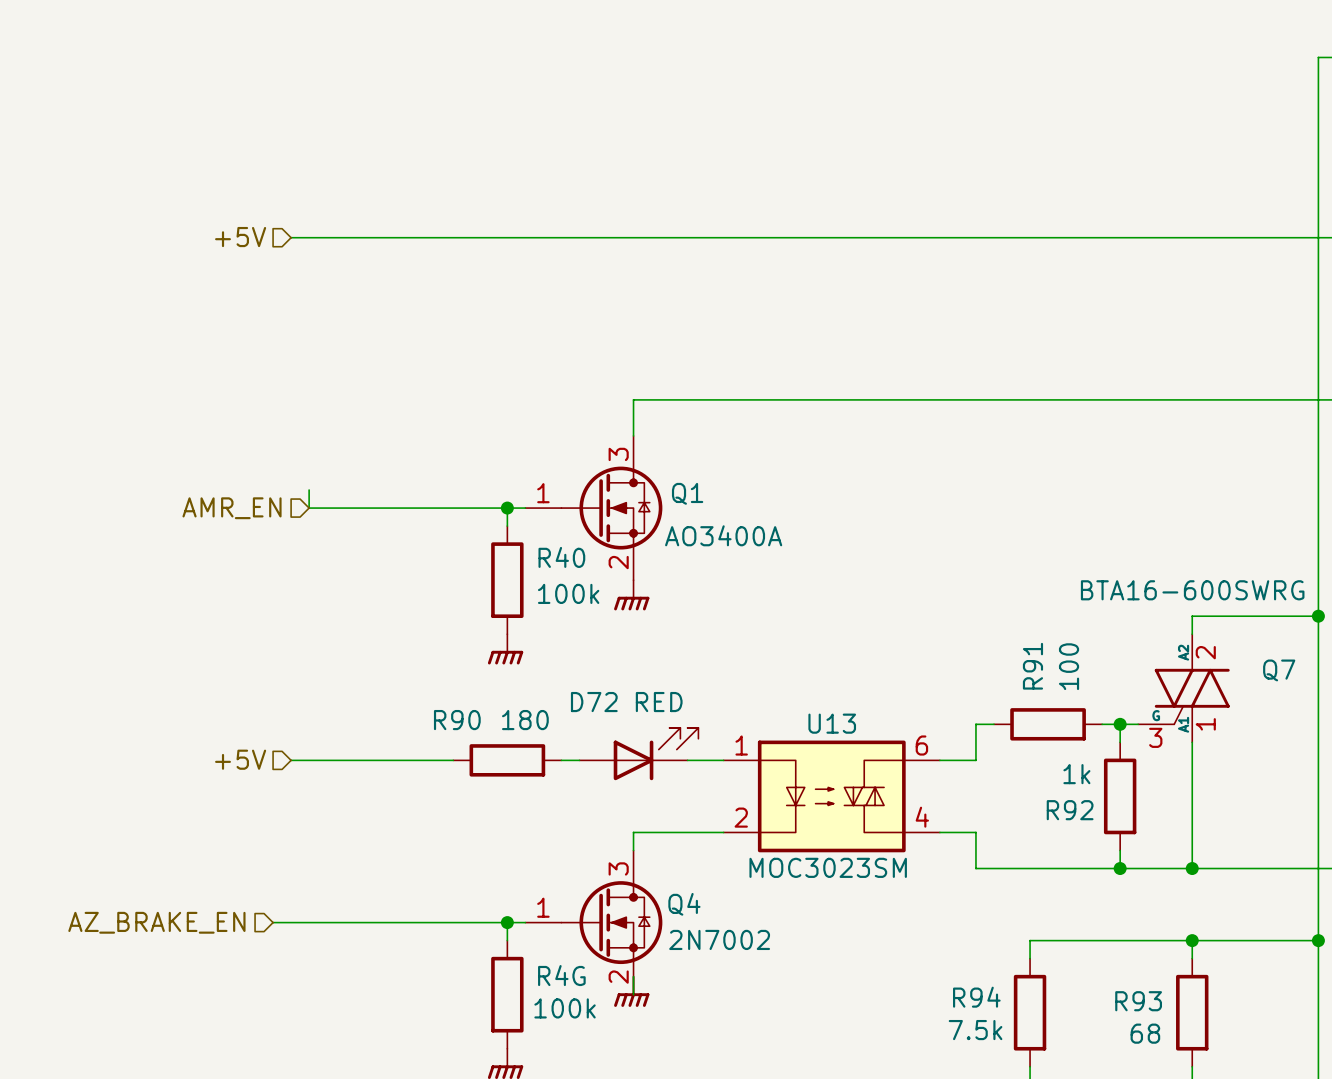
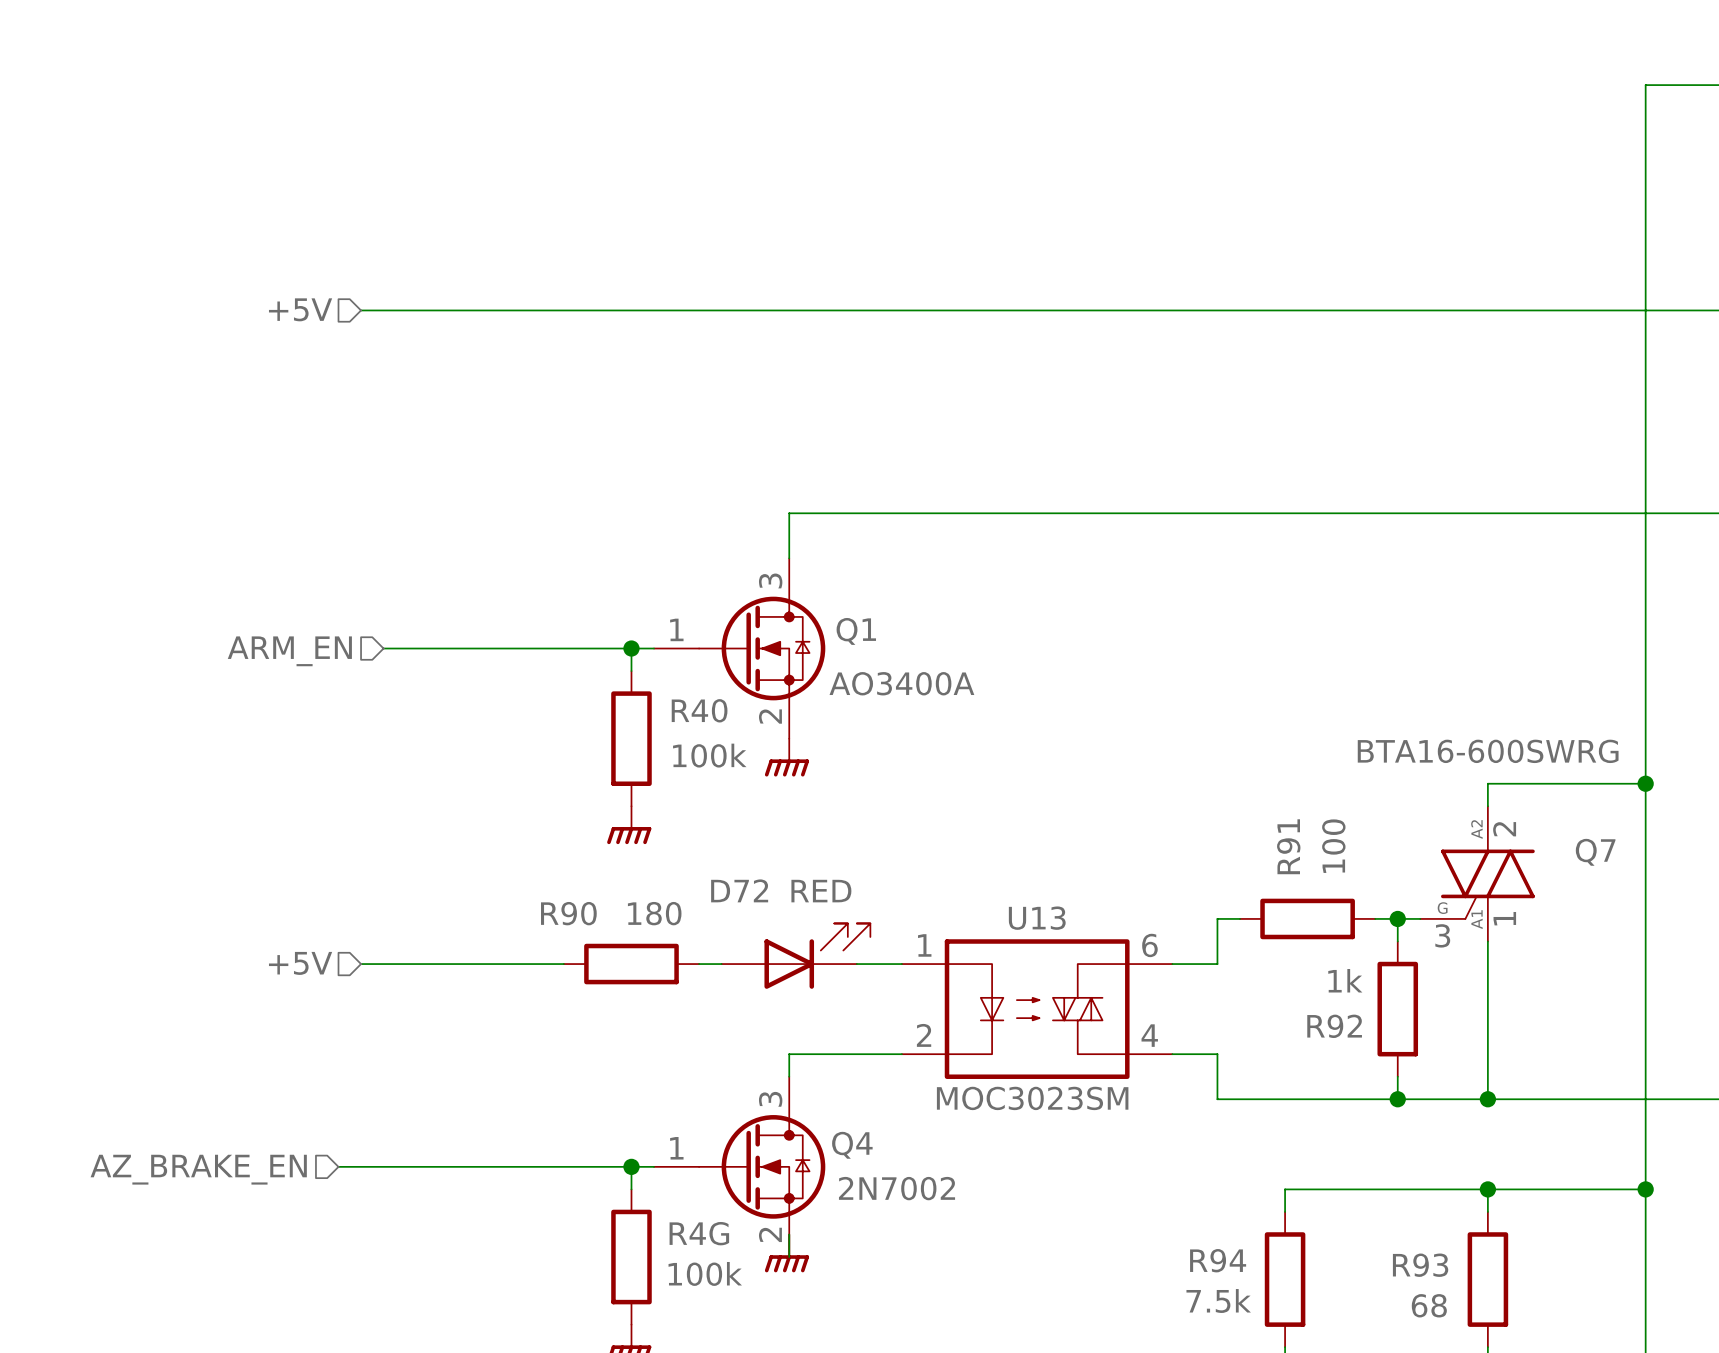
wire: (309, 490) (309, 508) -> none
hierarchical label: AMR_EN (232, 508) -> ARM_EN (289, 651)

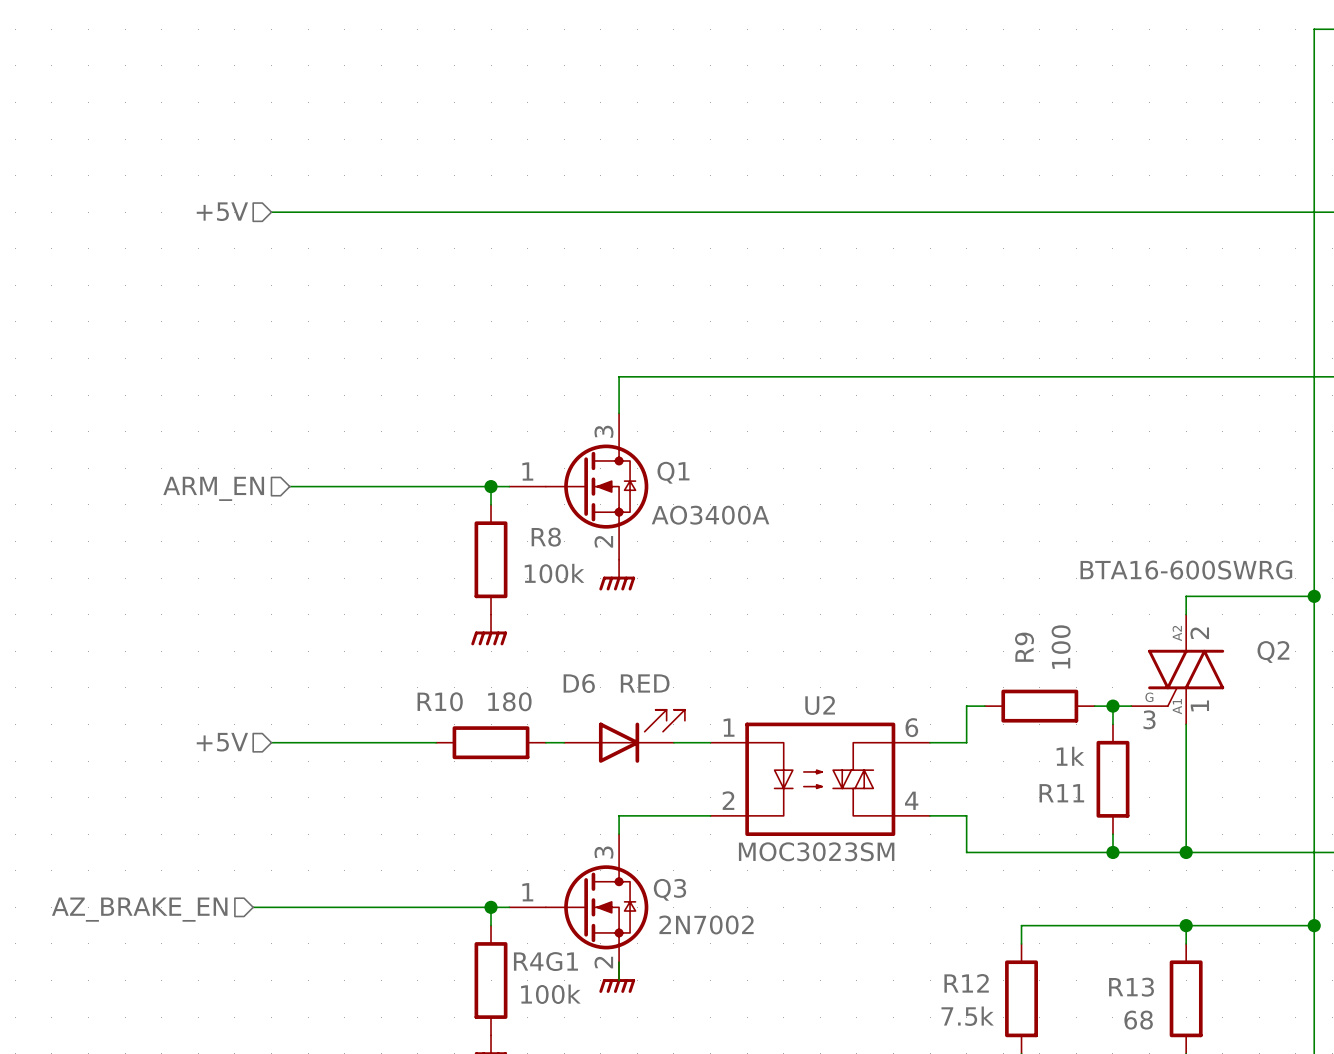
R40 name: R40 (699, 710) -> R8 (546, 537)
R91 name: R91 (1288, 846) -> R9 (1024, 647)
Q7 name: Q7 (1595, 852) -> Q2 (1273, 652)
D72 name: D72 (739, 890) -> D6 (579, 683)
R90 name: R90 (568, 913) -> R10 (440, 701)
U13 name: U13 (1037, 918) -> U2 (820, 705)
R92 name: R92 (1334, 1026) -> R11 (1061, 793)
Q4 name: Q4 (852, 1145) -> Q3 (669, 889)
R4G name: R4G (699, 1233) -> R4G1 (545, 961)
R94 name: R94 (1218, 1260) -> R12 (966, 983)
R93 name: R93 (1420, 1265) -> R13 (1131, 987)

